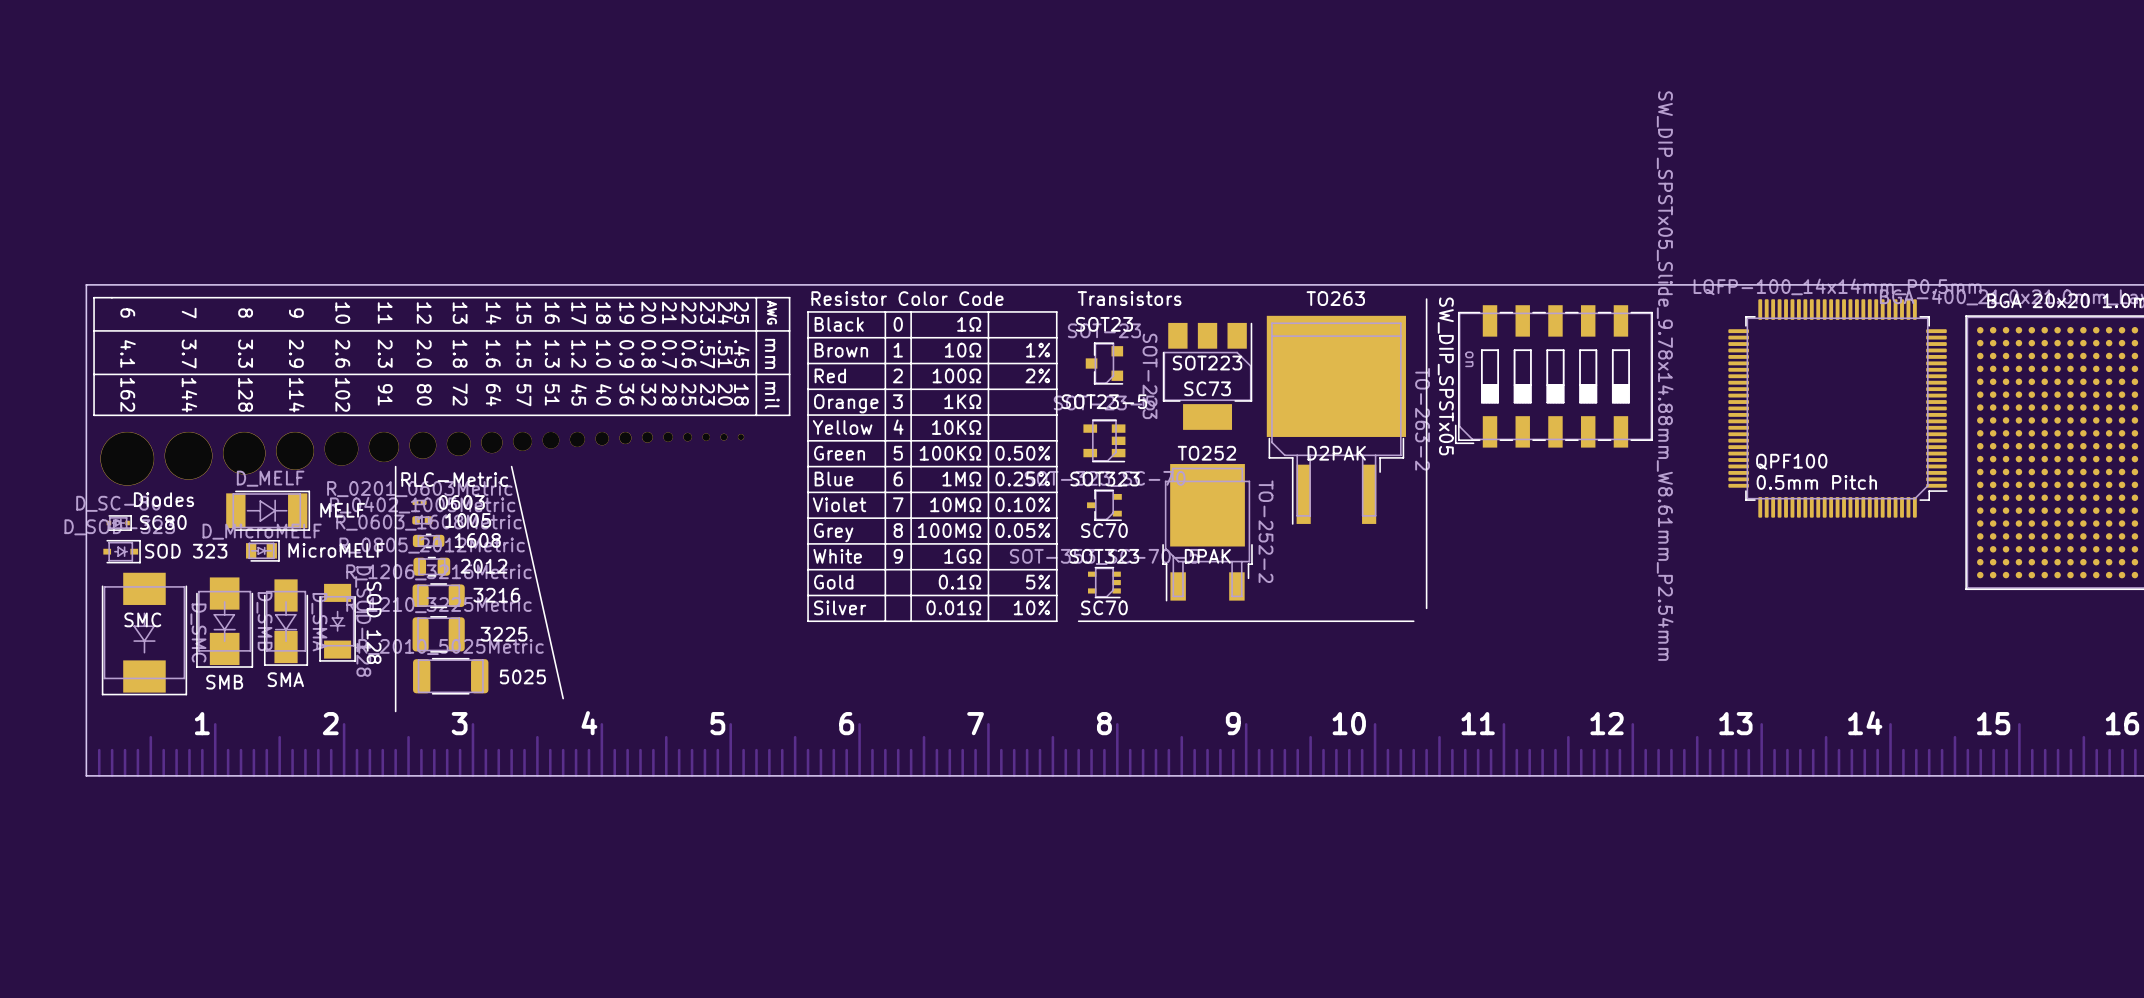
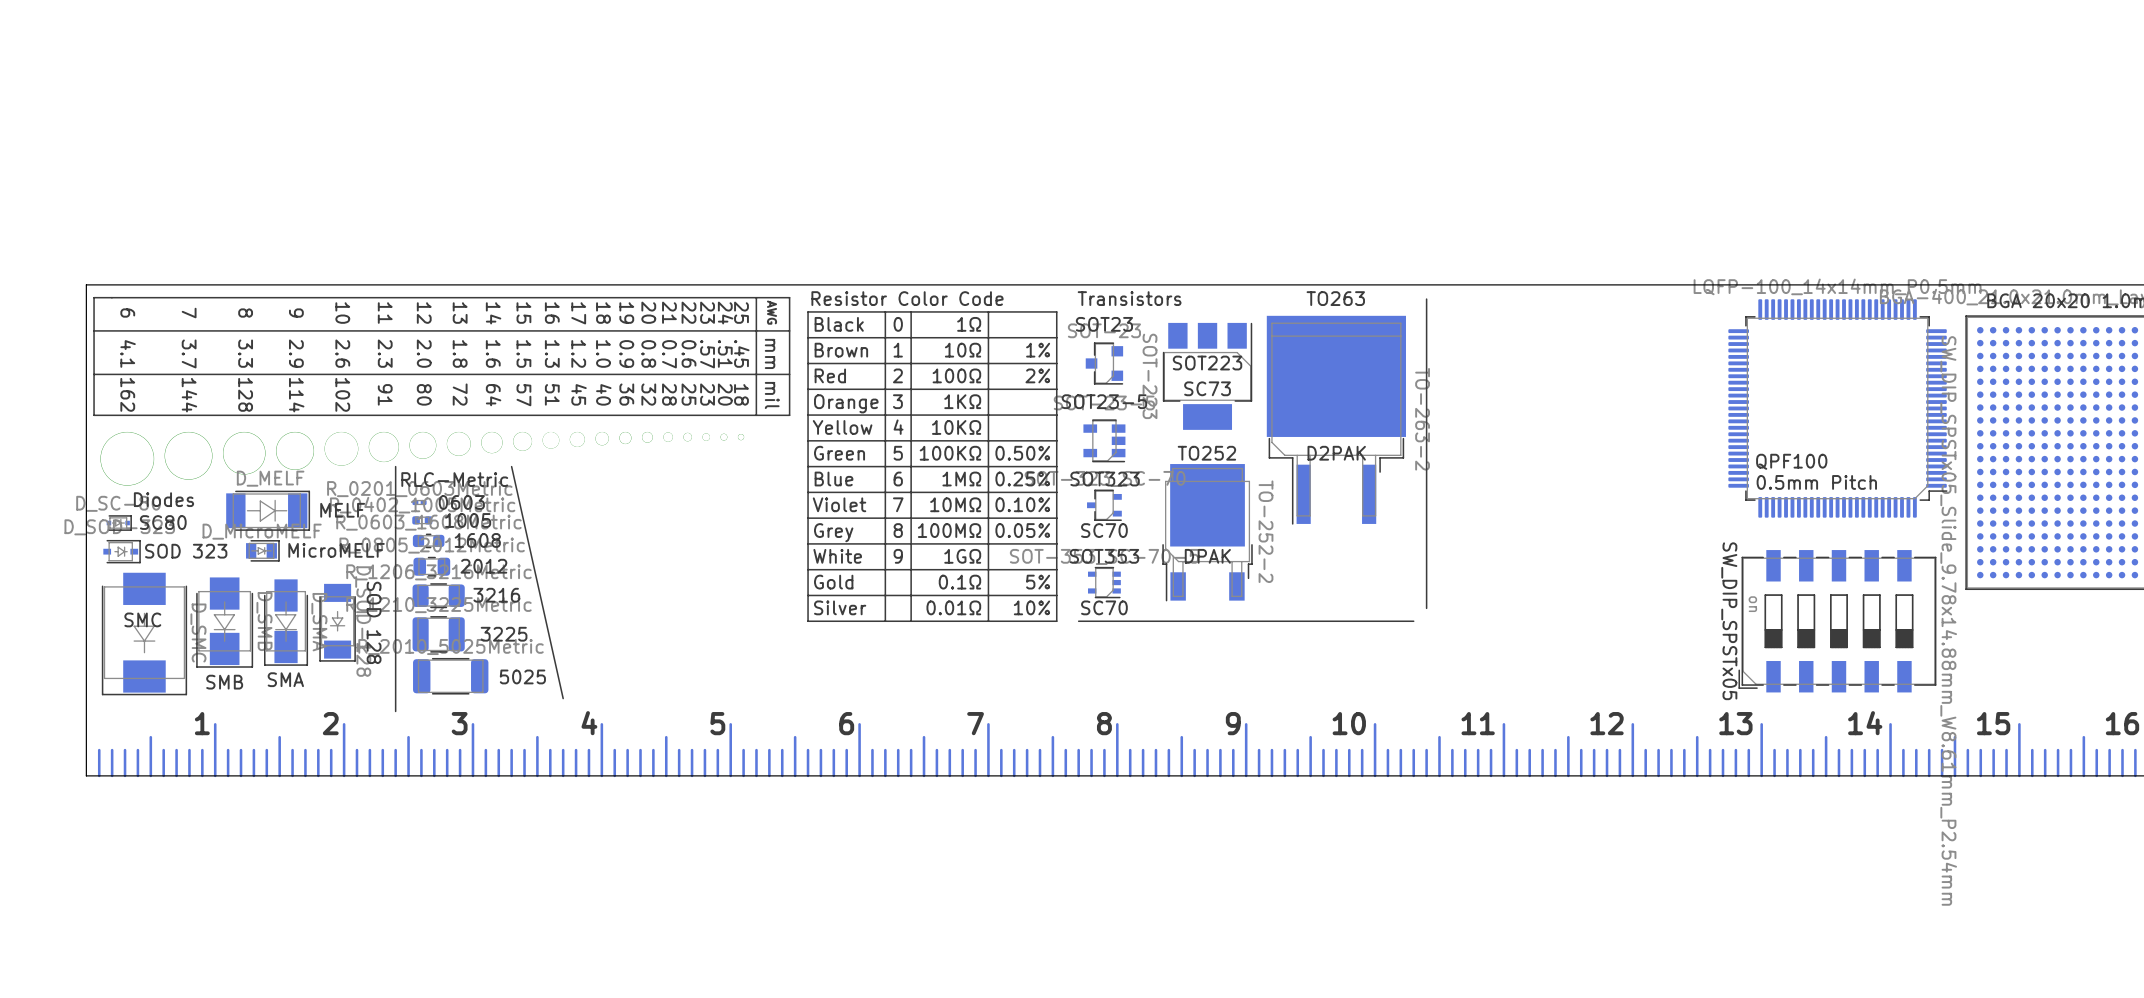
SW_DIP_SPSTx05 position: (1553, 376) -> (1837, 621)
SOT323 name: SOT323 (1104, 556) -> SOT353 (1104, 556)

